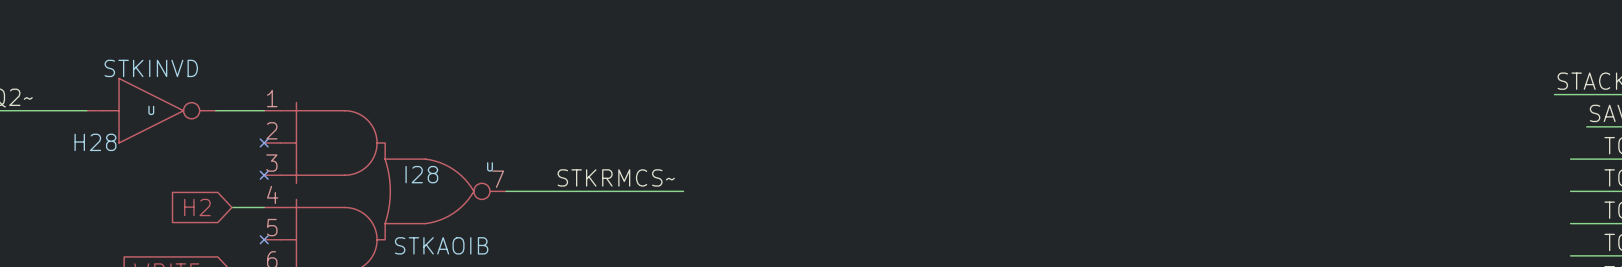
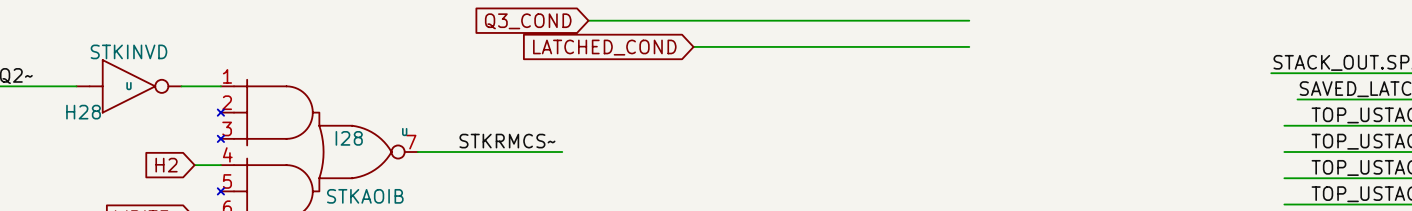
global label: none -> Q3_COND (528, 21)
wire: none -> (588, 20) (969, 20)
wire: none -> (693, 46) (969, 46)
global label: none -> LATCHED_COND (604, 47)

